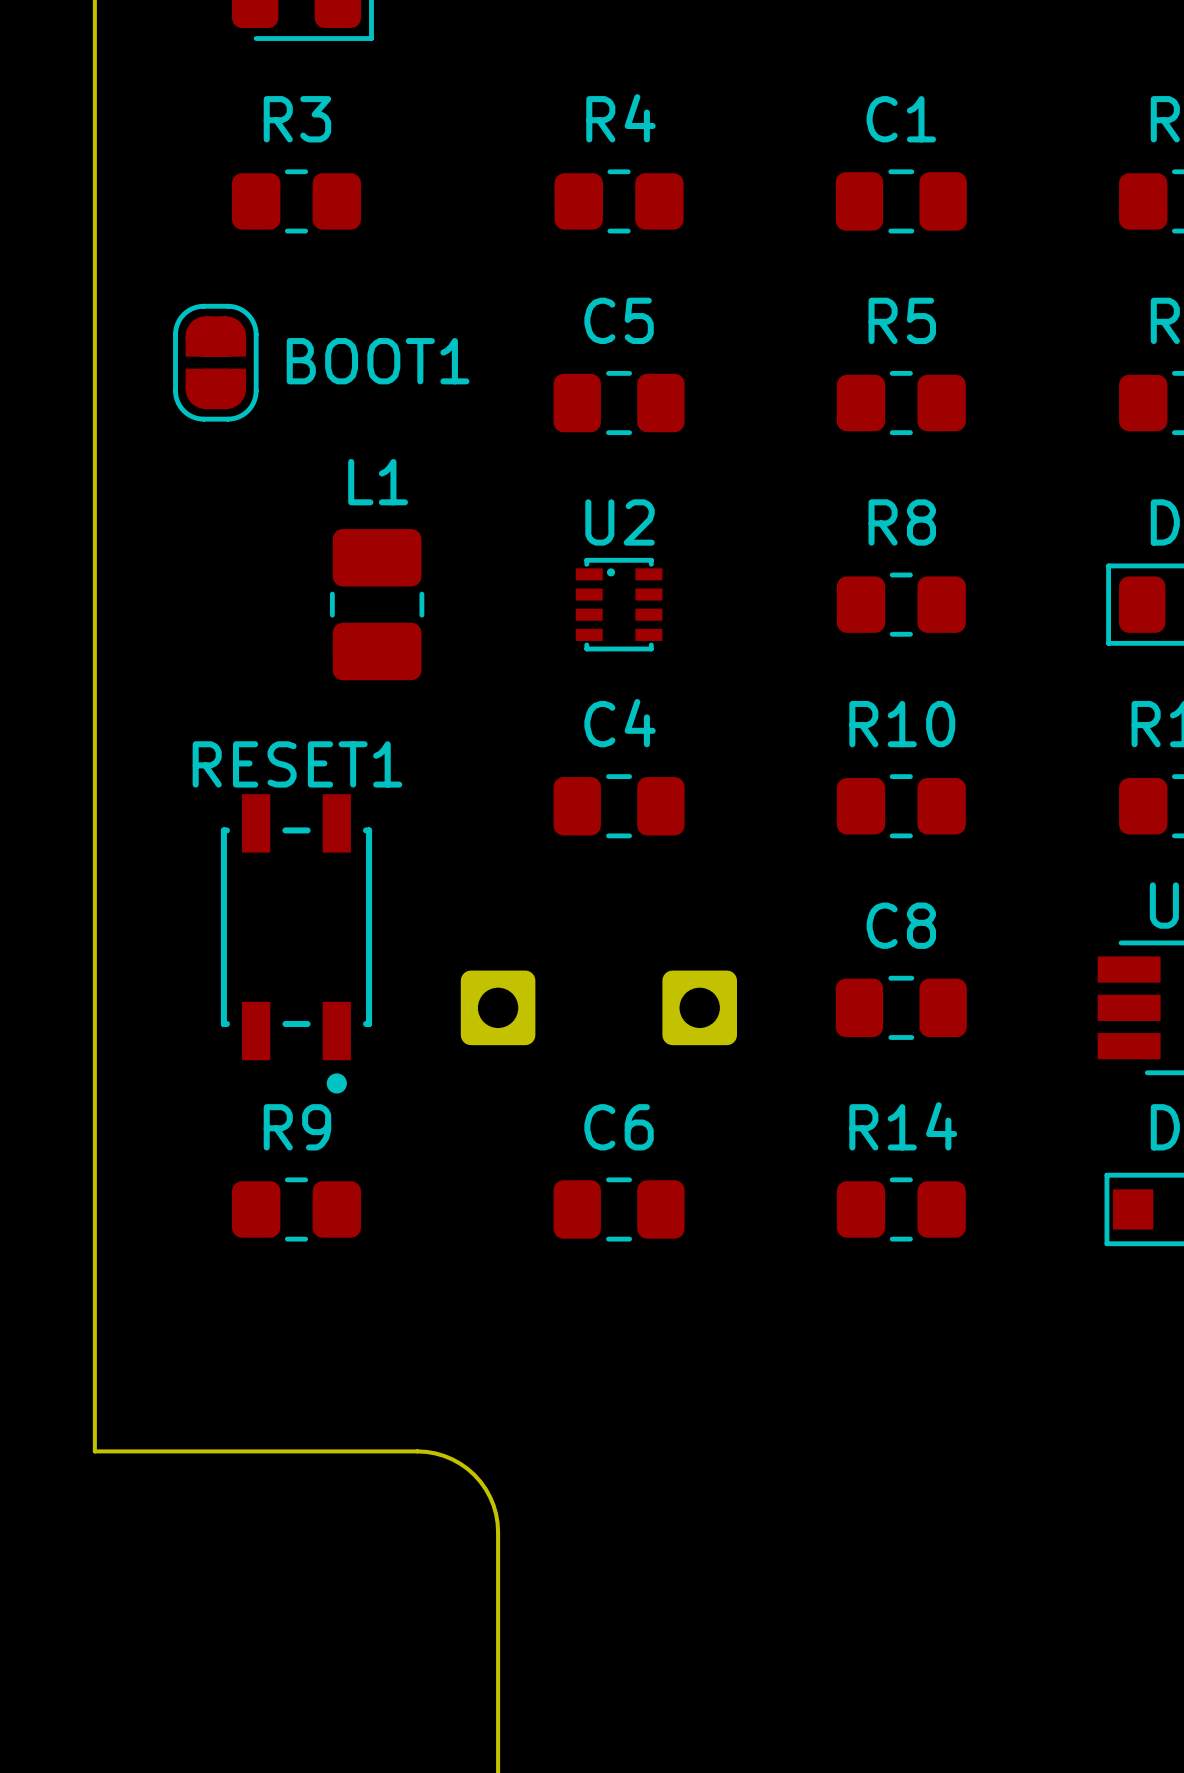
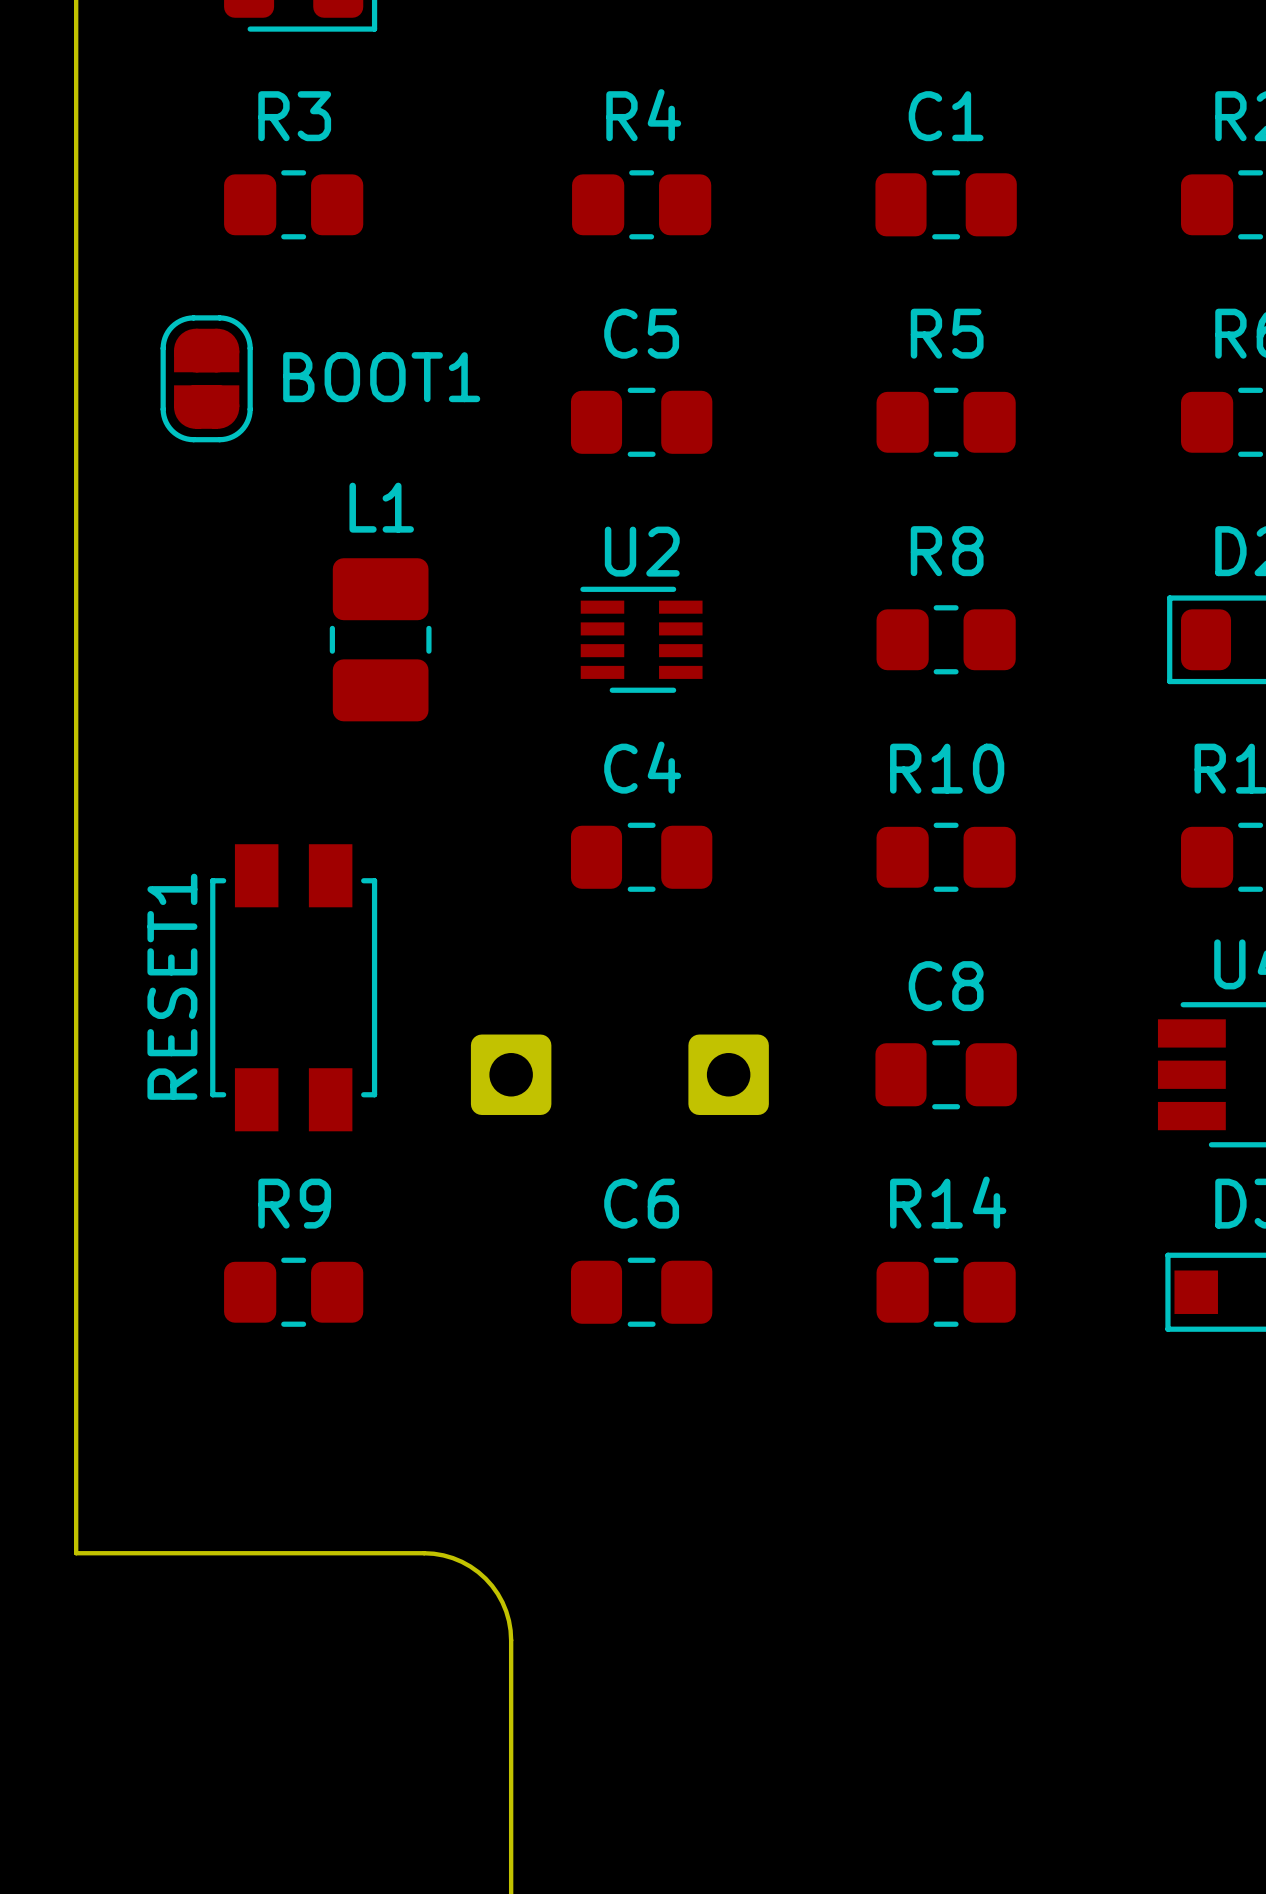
U2 footprint: [575, 557, 663, 652] -> [580, 586, 703, 693]
RESET1 name position: RESET1 (297, 764) -> RESET1 (172, 986)
RESET1 footprint: [220, 794, 373, 1094] -> [210, 844, 378, 1132]

